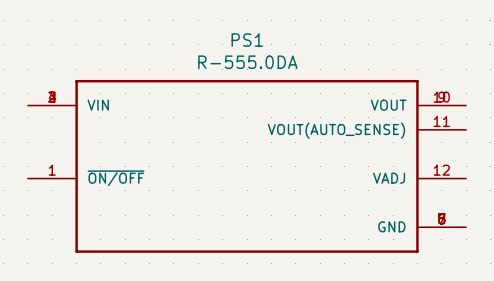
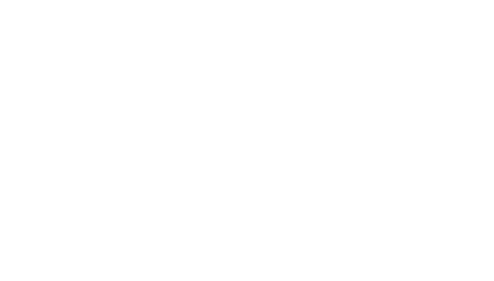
PS1: R-555.0DA (247, 166) -> none

